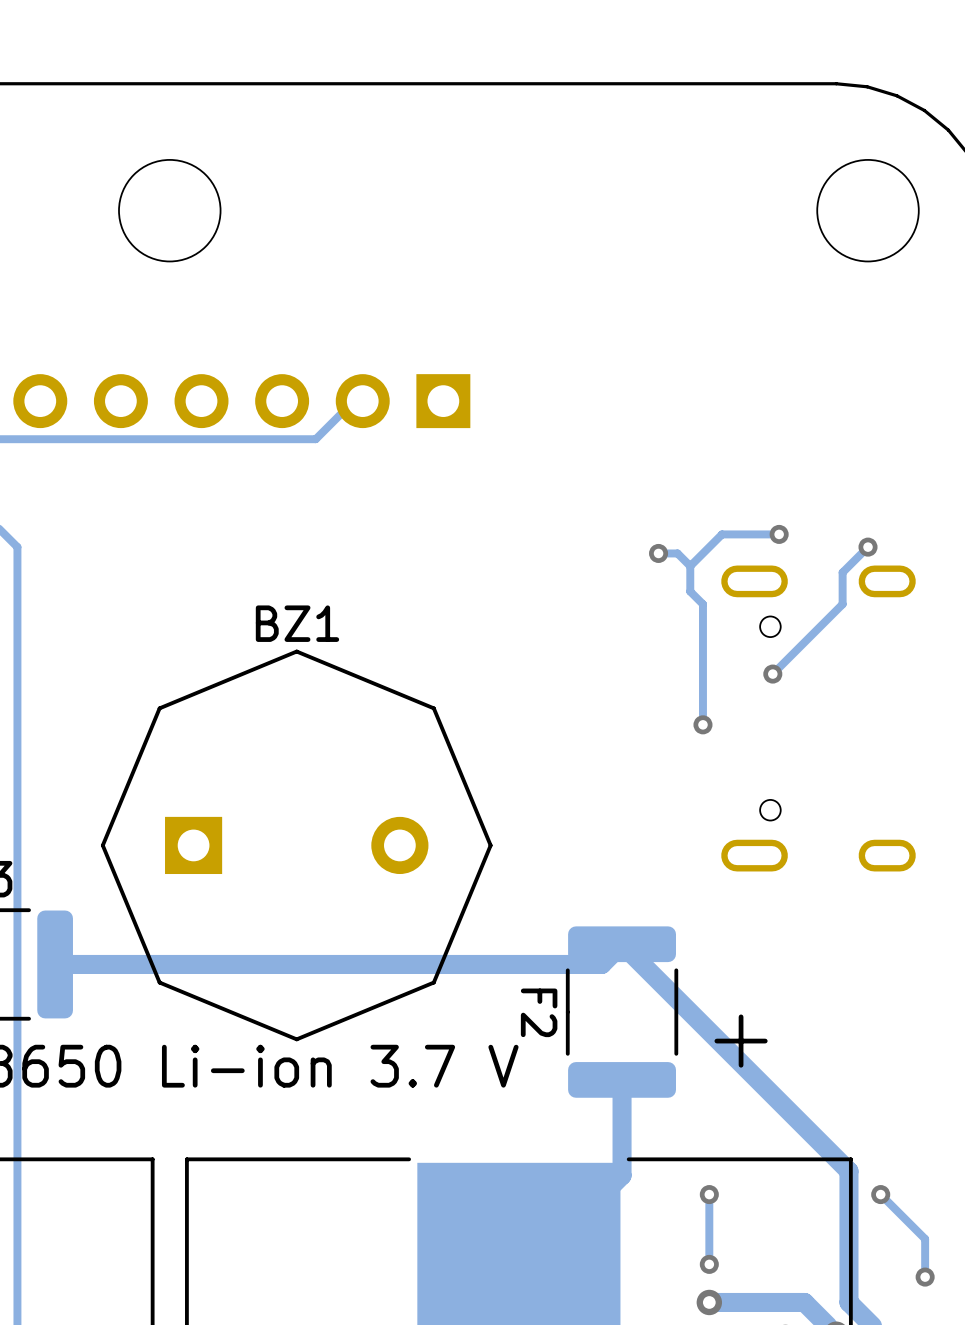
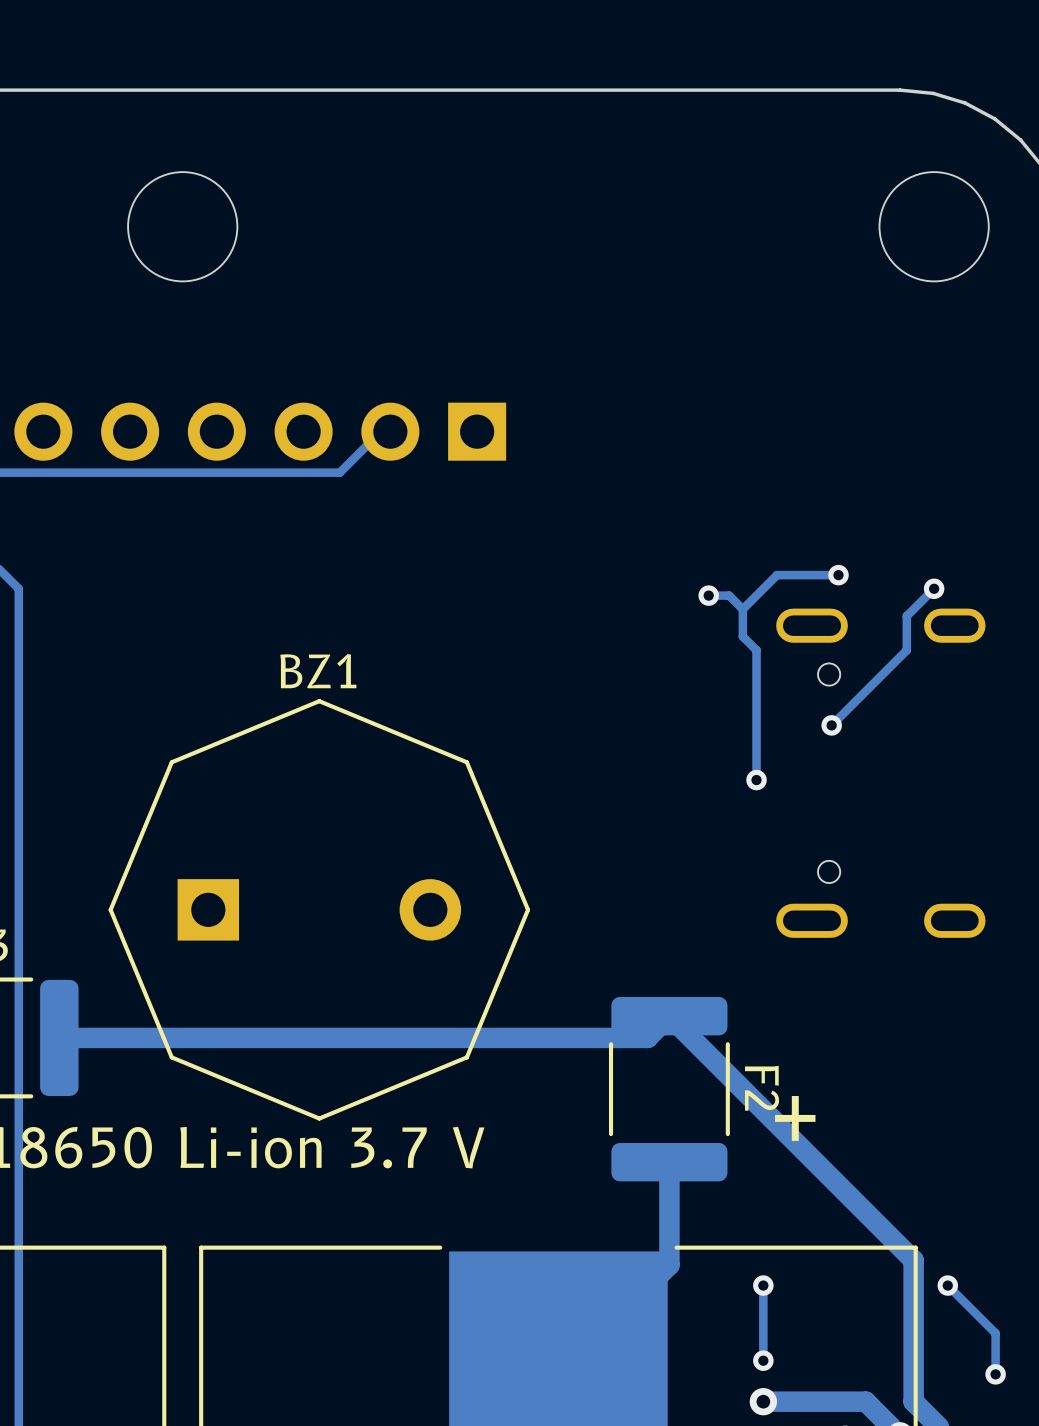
F2 name position: F2 (539, 1012) -> F2 (762, 1088)

